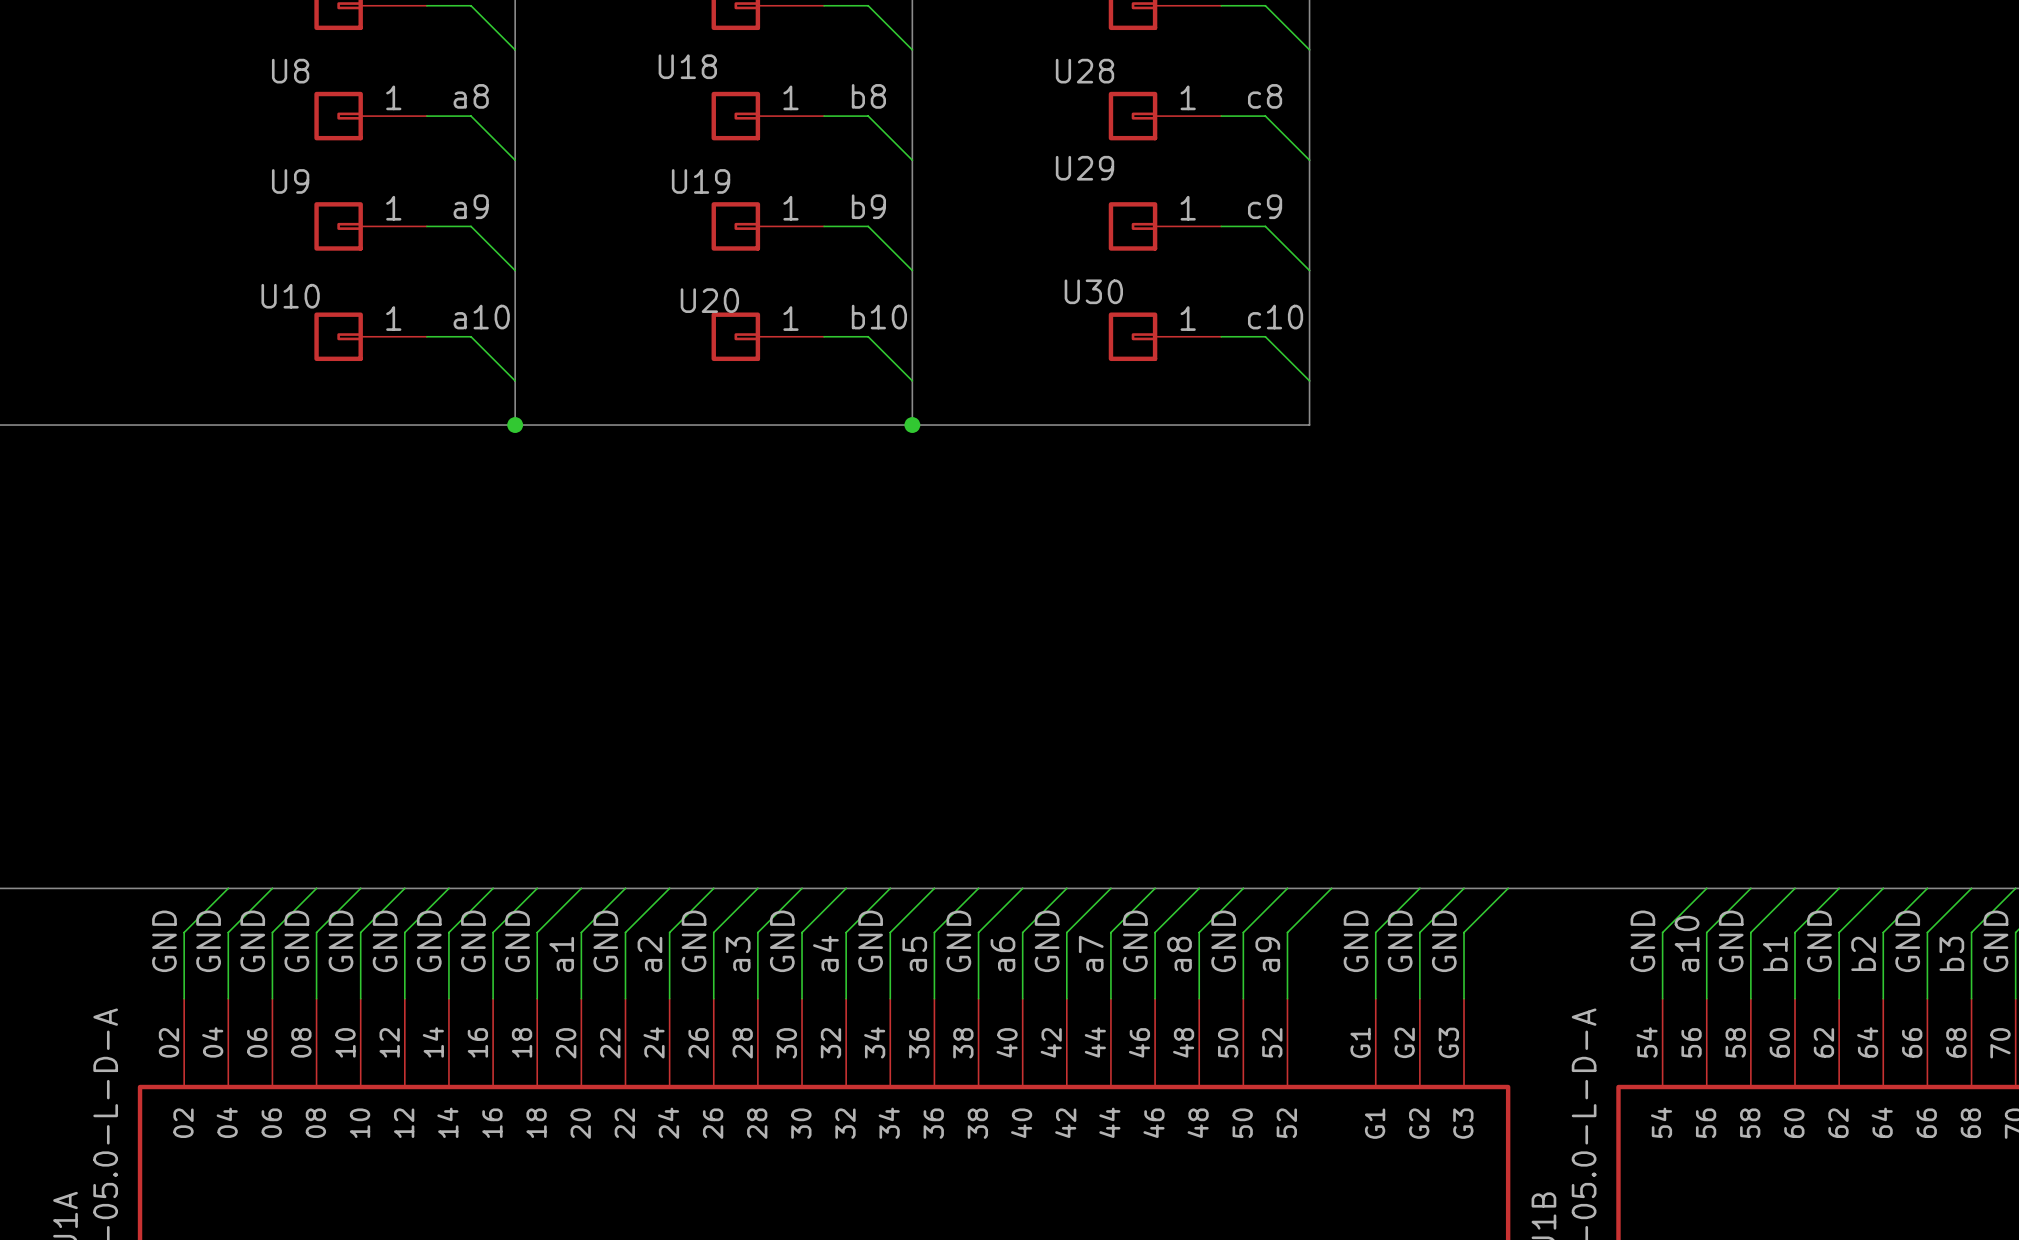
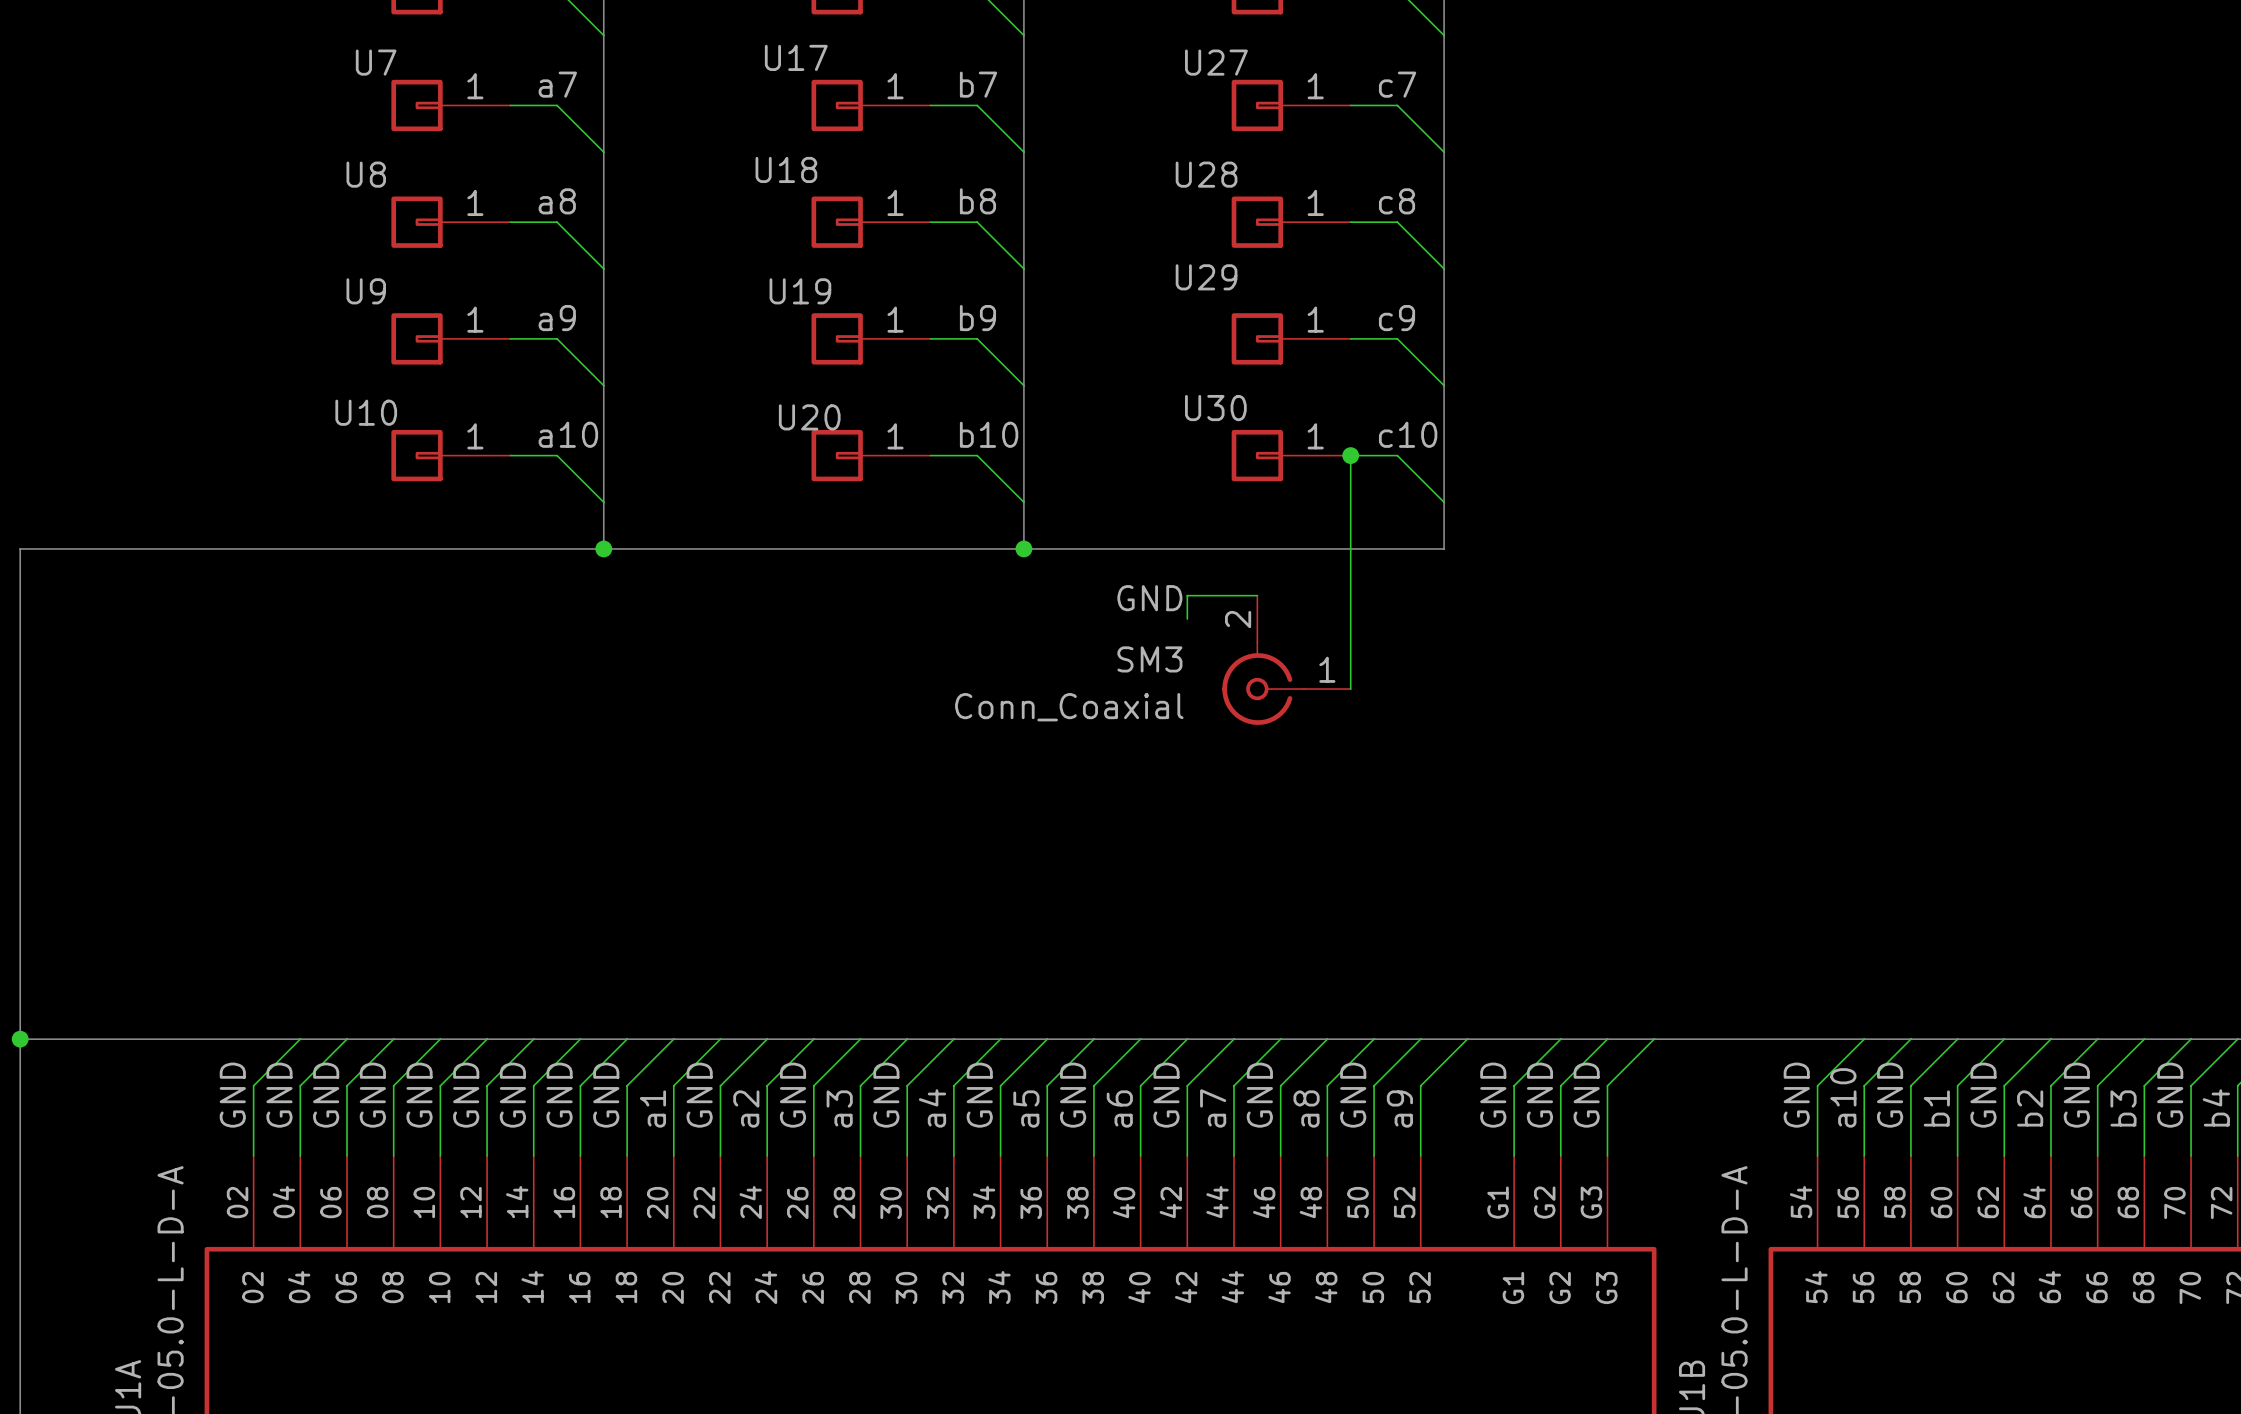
wire: none -> (1350, 455) (1350, 689)
junction: none -> (1350, 455)
wire: none -> (1257, 595) (1187, 595) (1187, 619)
label: none -> GND (1149, 598)
SM3: none -> Conn_Coaxial (1286, 660)

